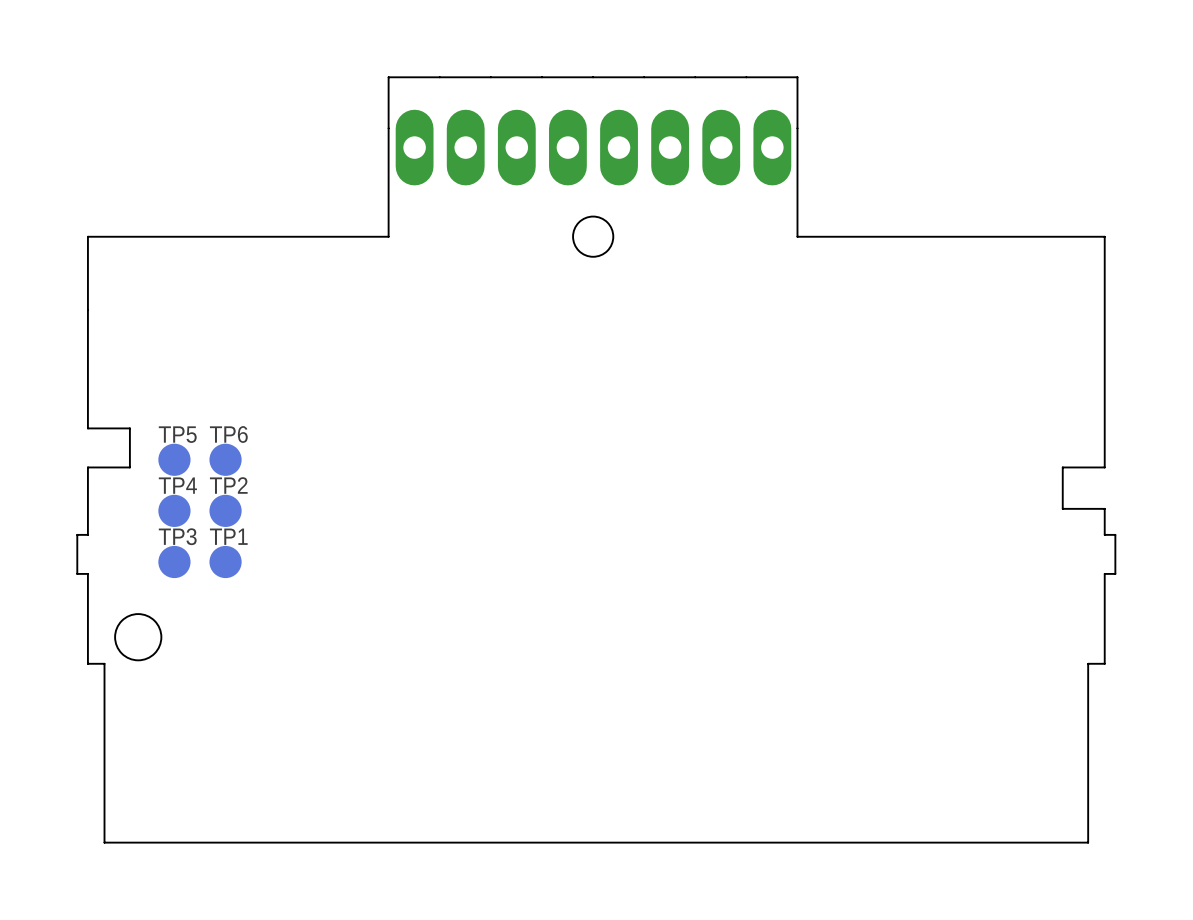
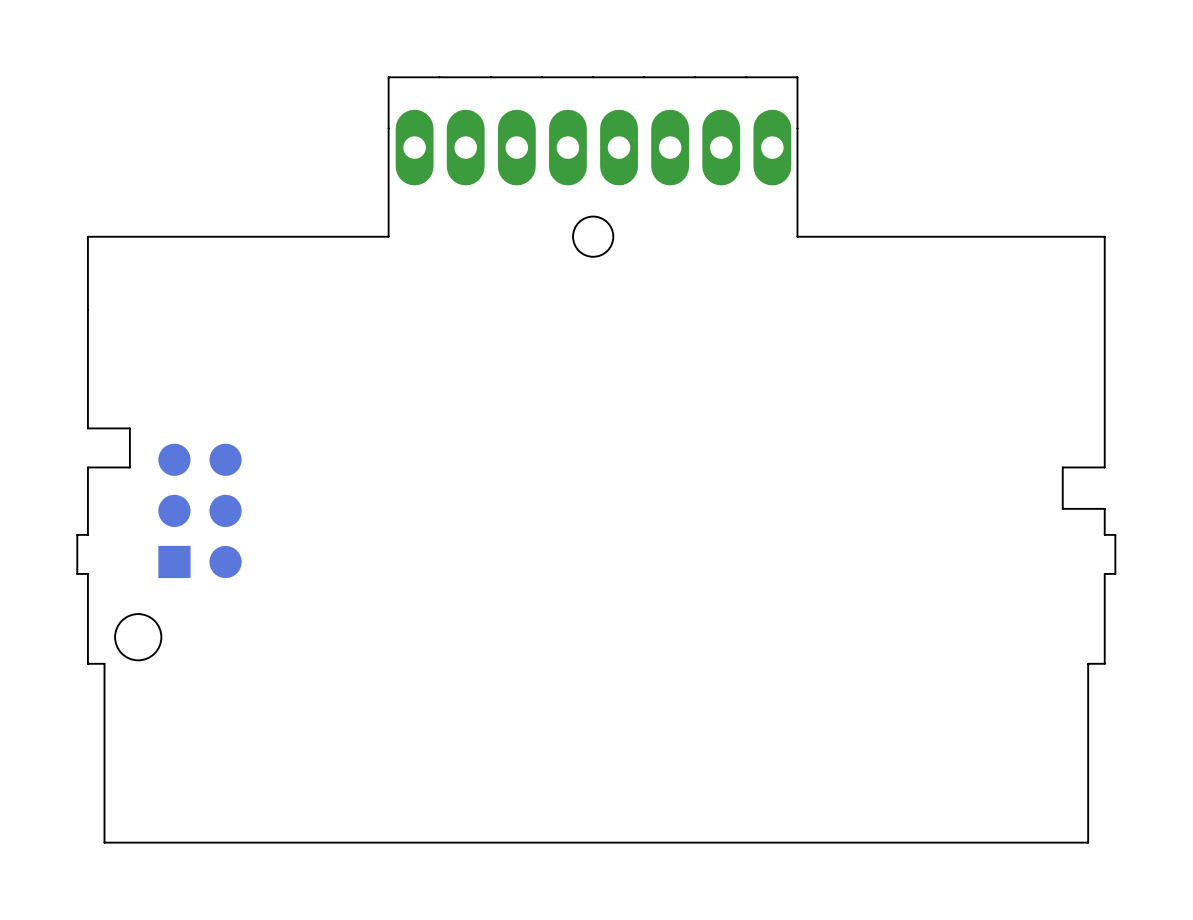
TP5 name: TP5 (177, 434) -> none
TP6 name: TP6 (228, 434) -> none
TP4 name: TP4 (177, 485) -> none
TP2 name: TP2 (228, 485) -> none
TP1 name: TP1 (228, 536) -> none
TP3: (174, 562) -> none
part: none -> (174, 562)

